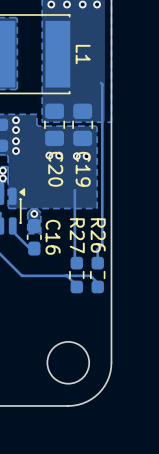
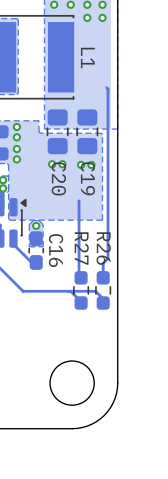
via: none -> (87, 17)
via: none -> (102, 17)

